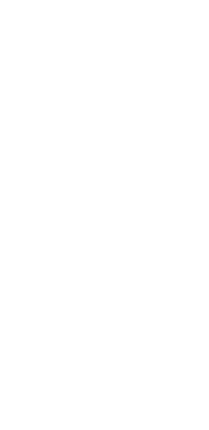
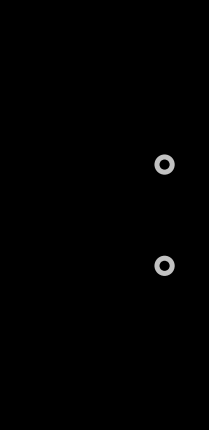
via: none -> (164, 164)
via: none -> (164, 265)

